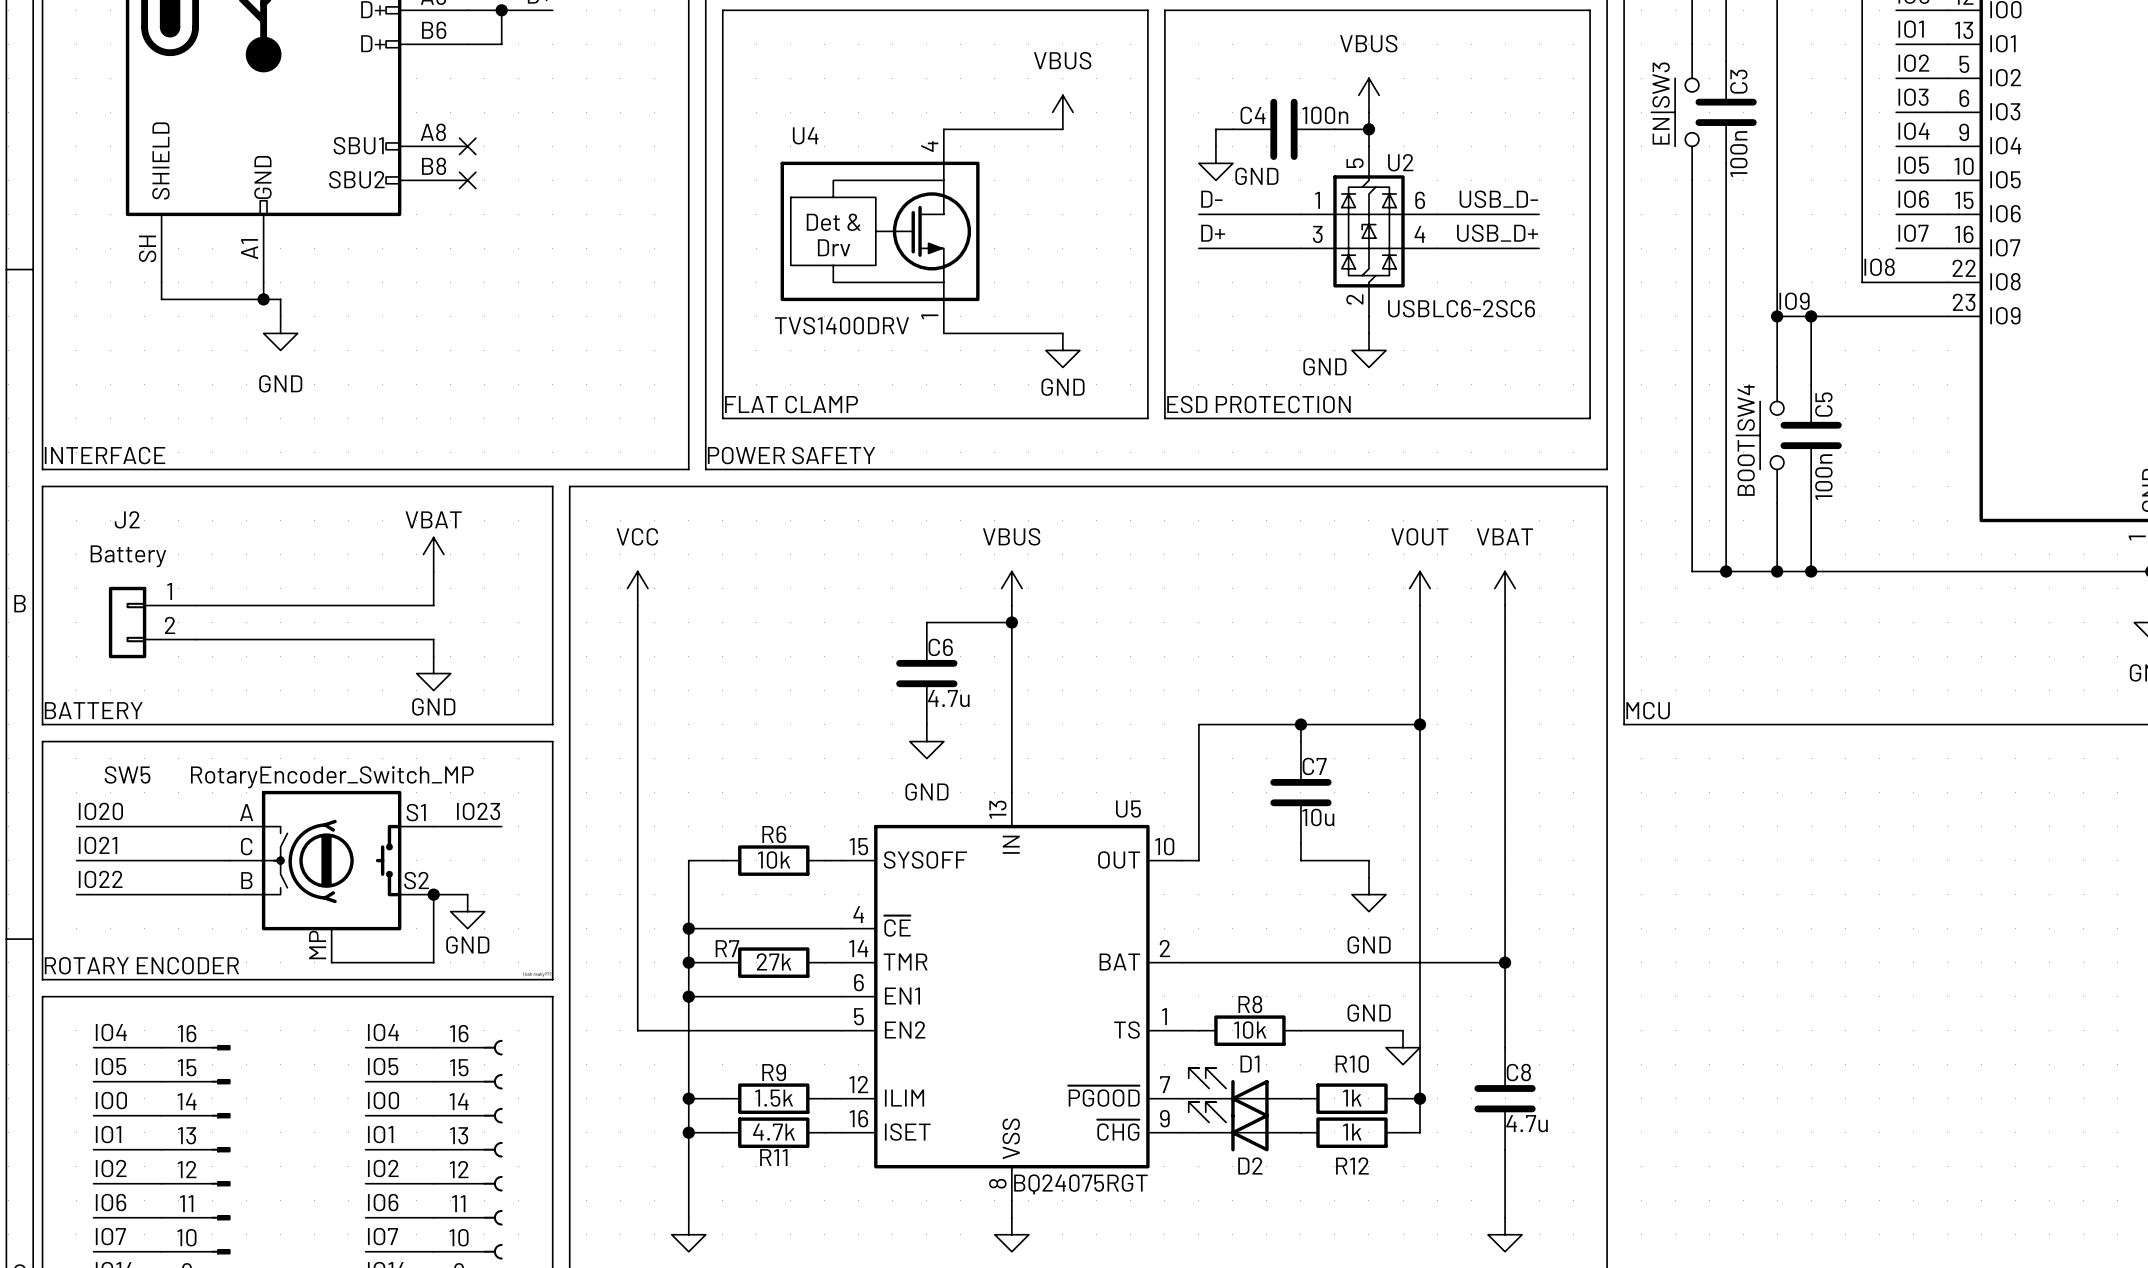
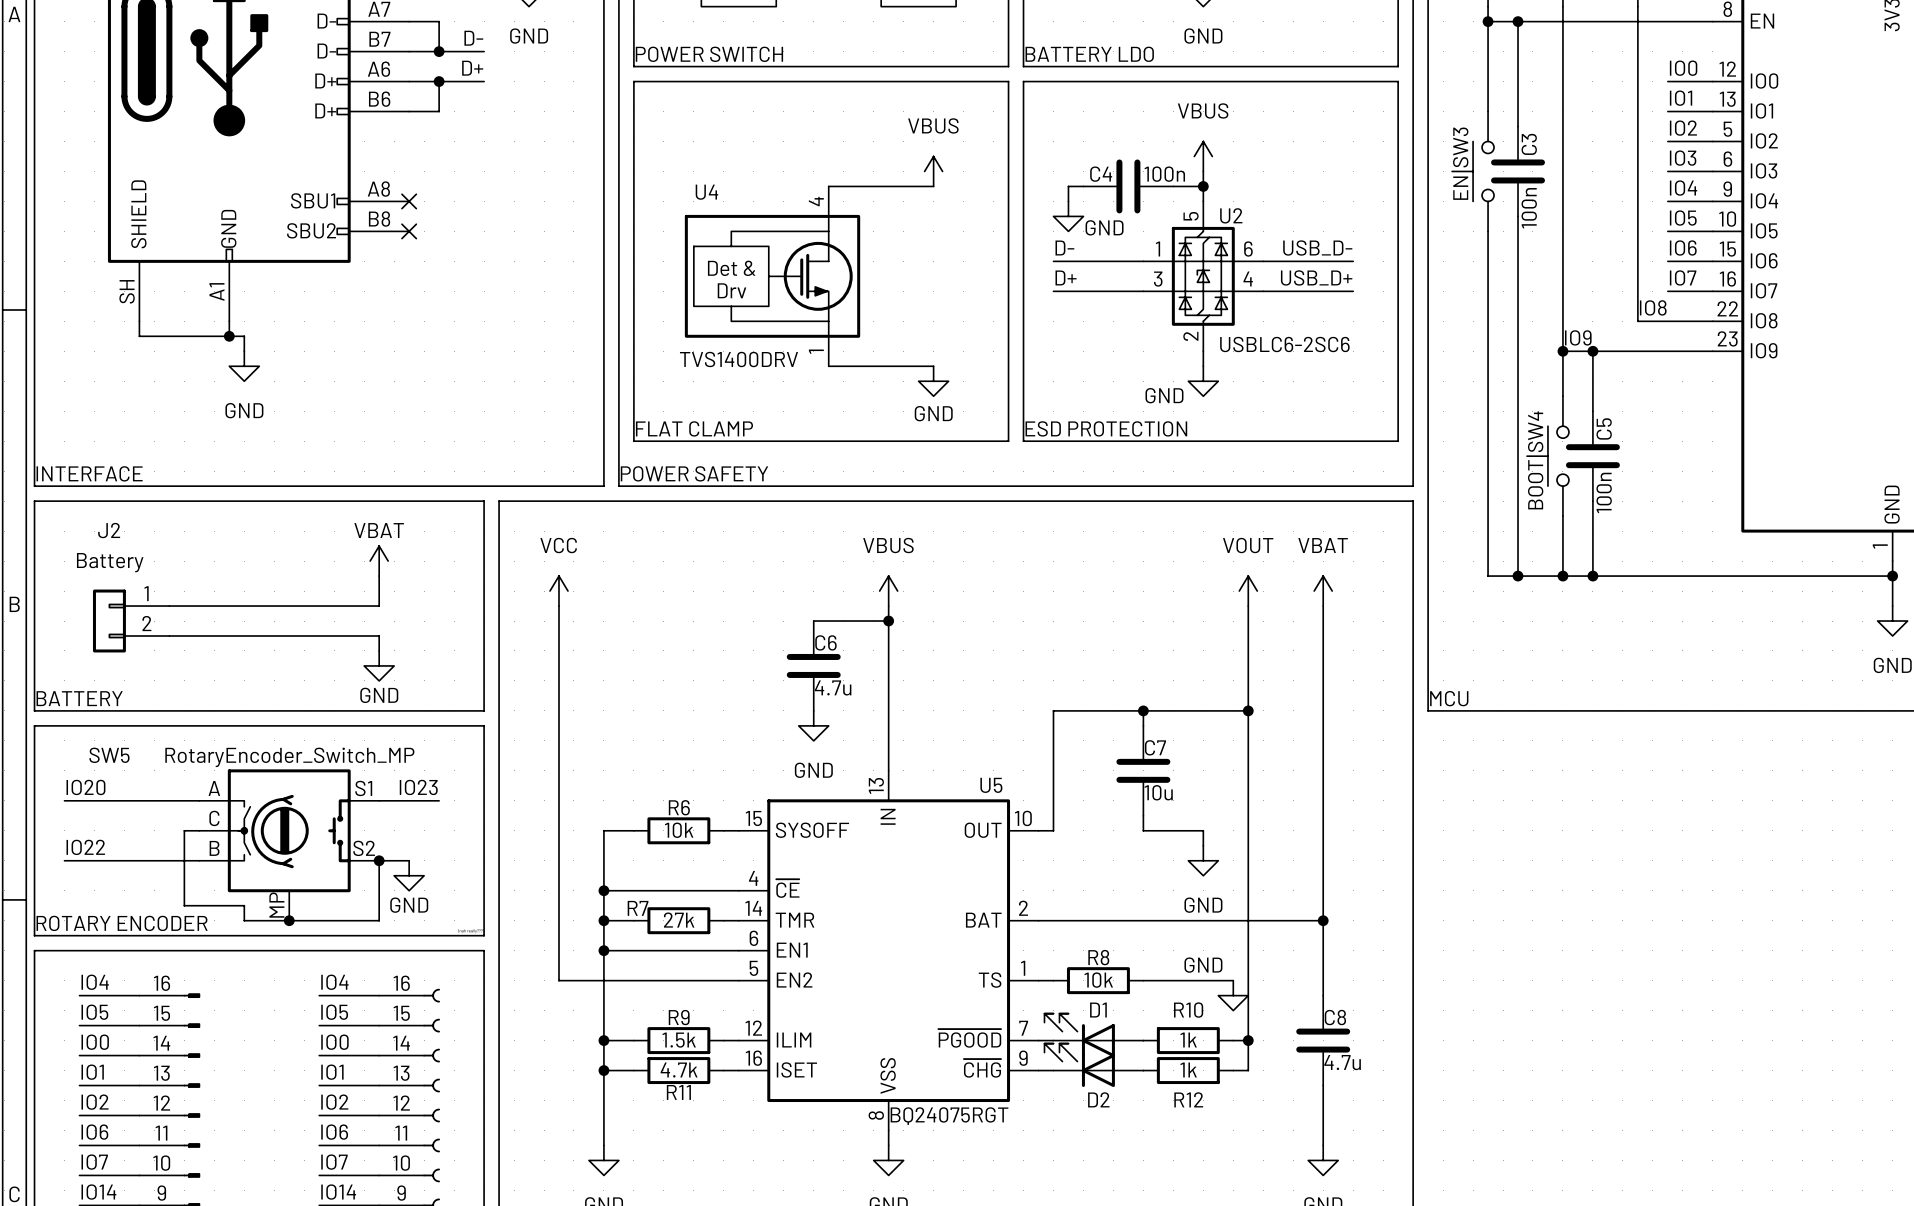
label: IO21 (98, 845) -> none
wire: (76, 860) (212, 860) -> (289, 920) (244, 920) (244, 905) (184, 905) (184, 830)
junction: none -> (289, 920)

